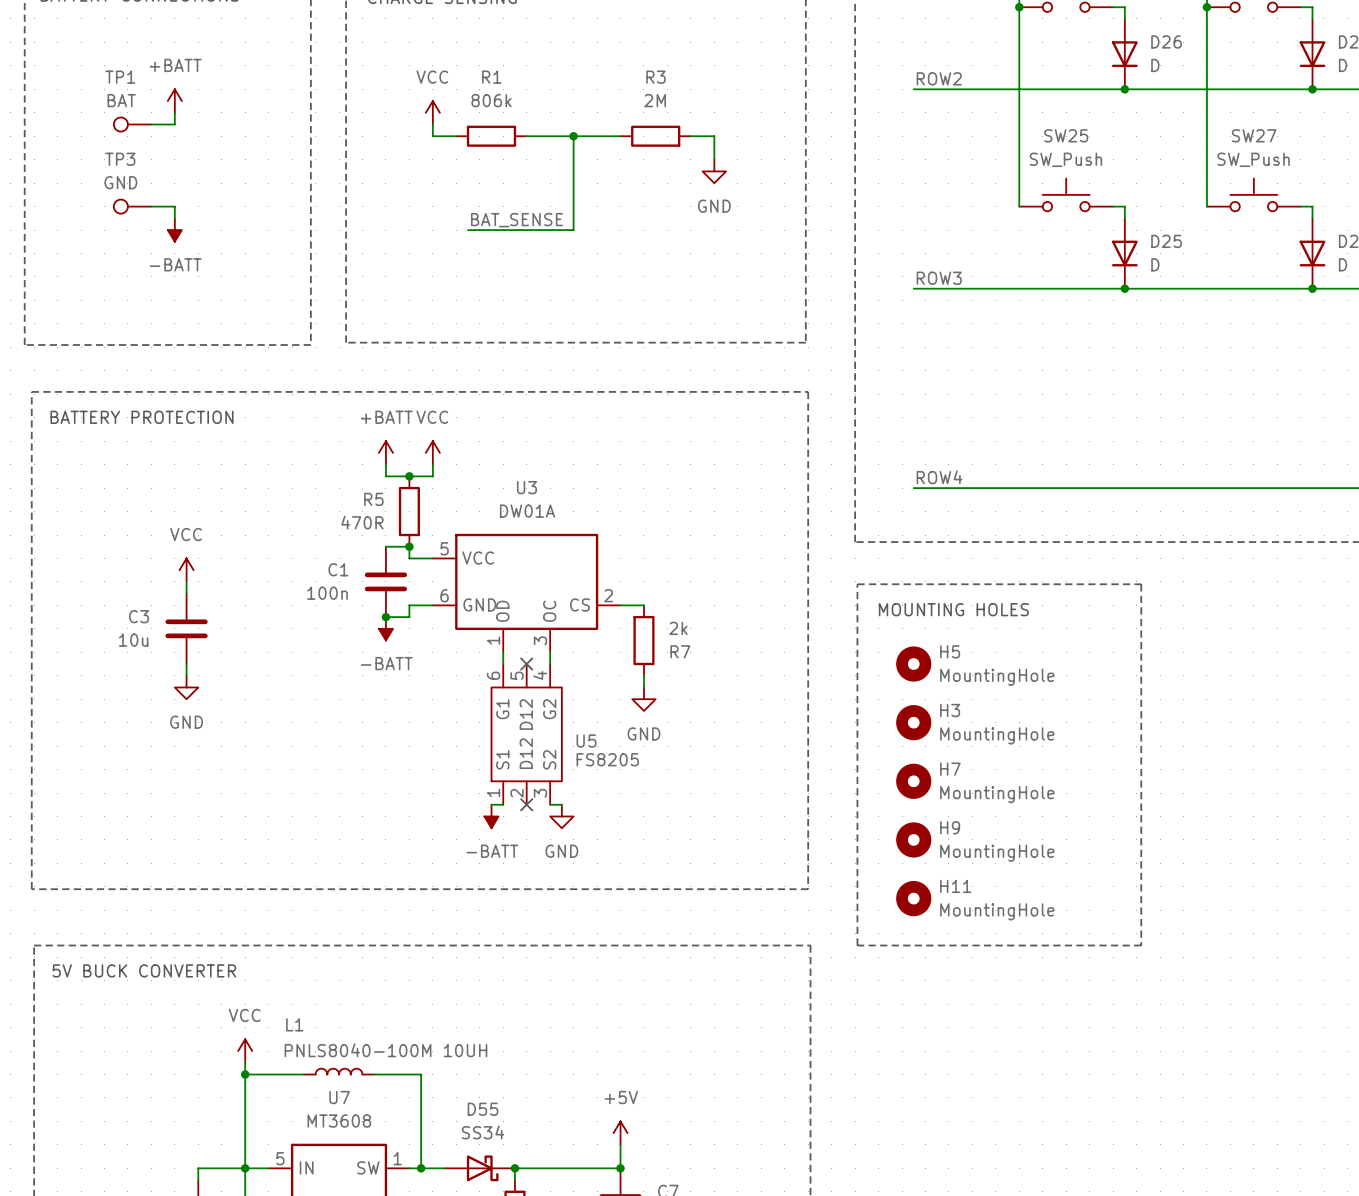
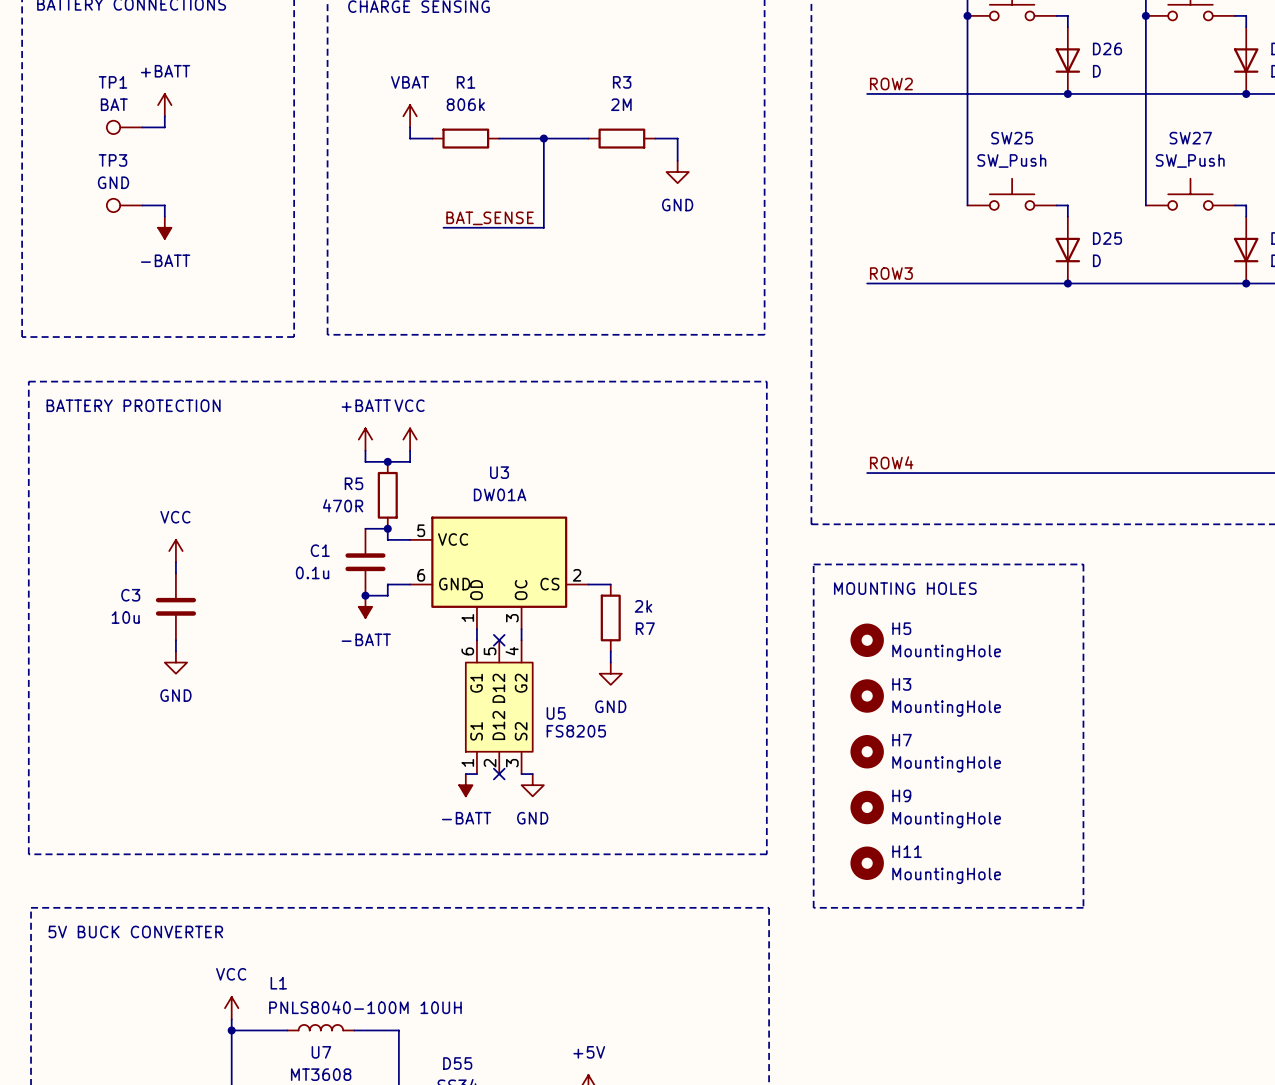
power symbol: VCC (432, 112) -> VBAT (410, 116)
C1 value: 100n (327, 593) -> 0.1u (312, 572)

